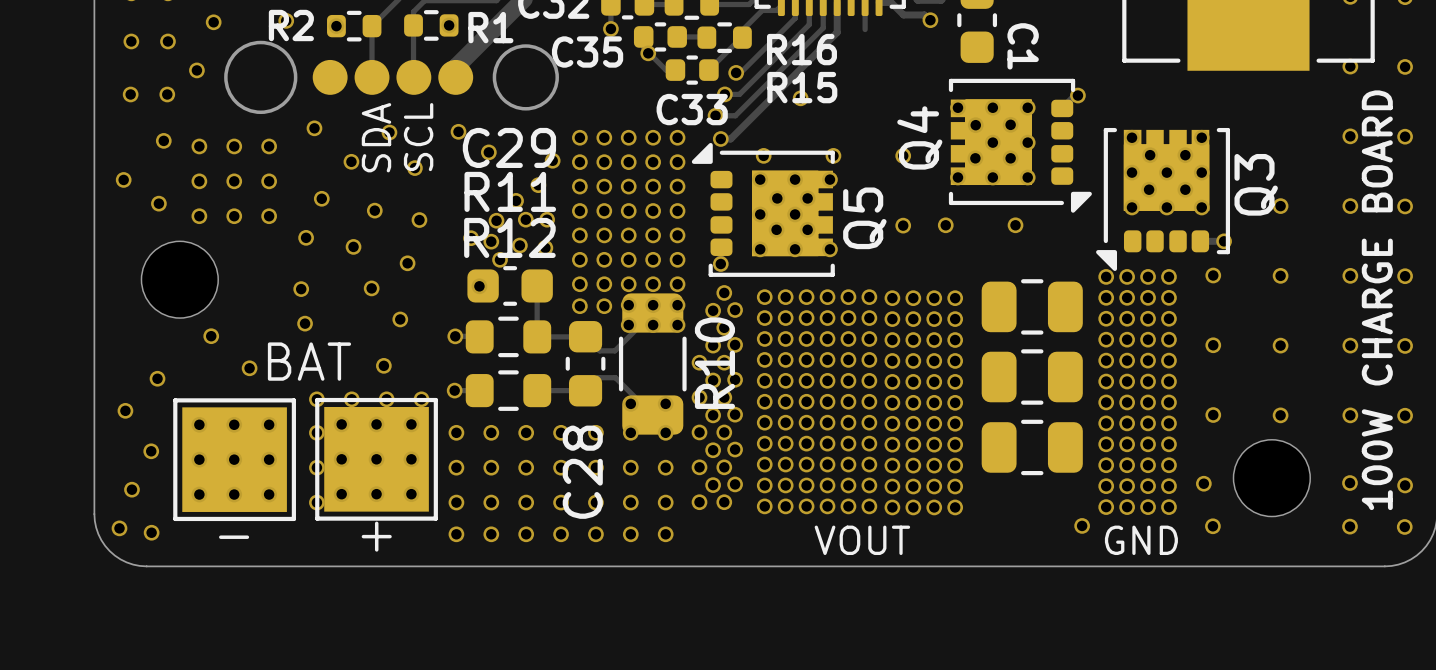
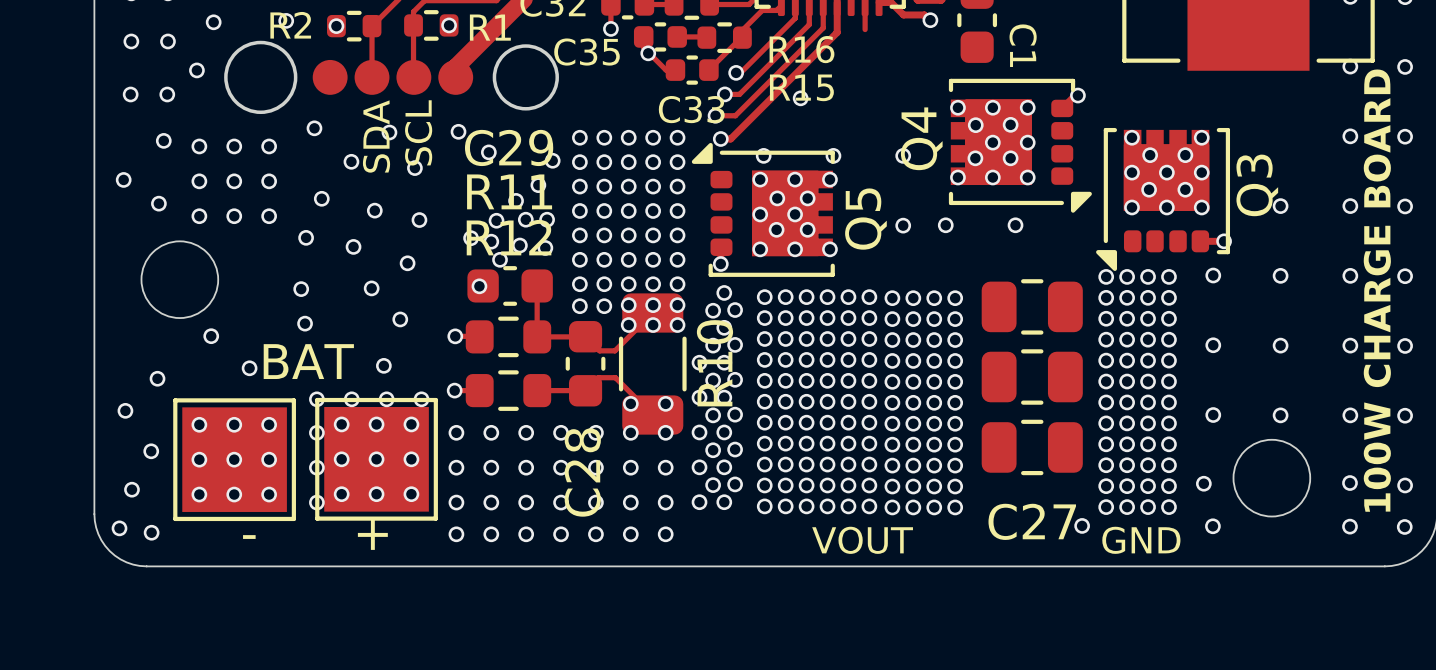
C27 name: none -> C27 (1032, 521)

